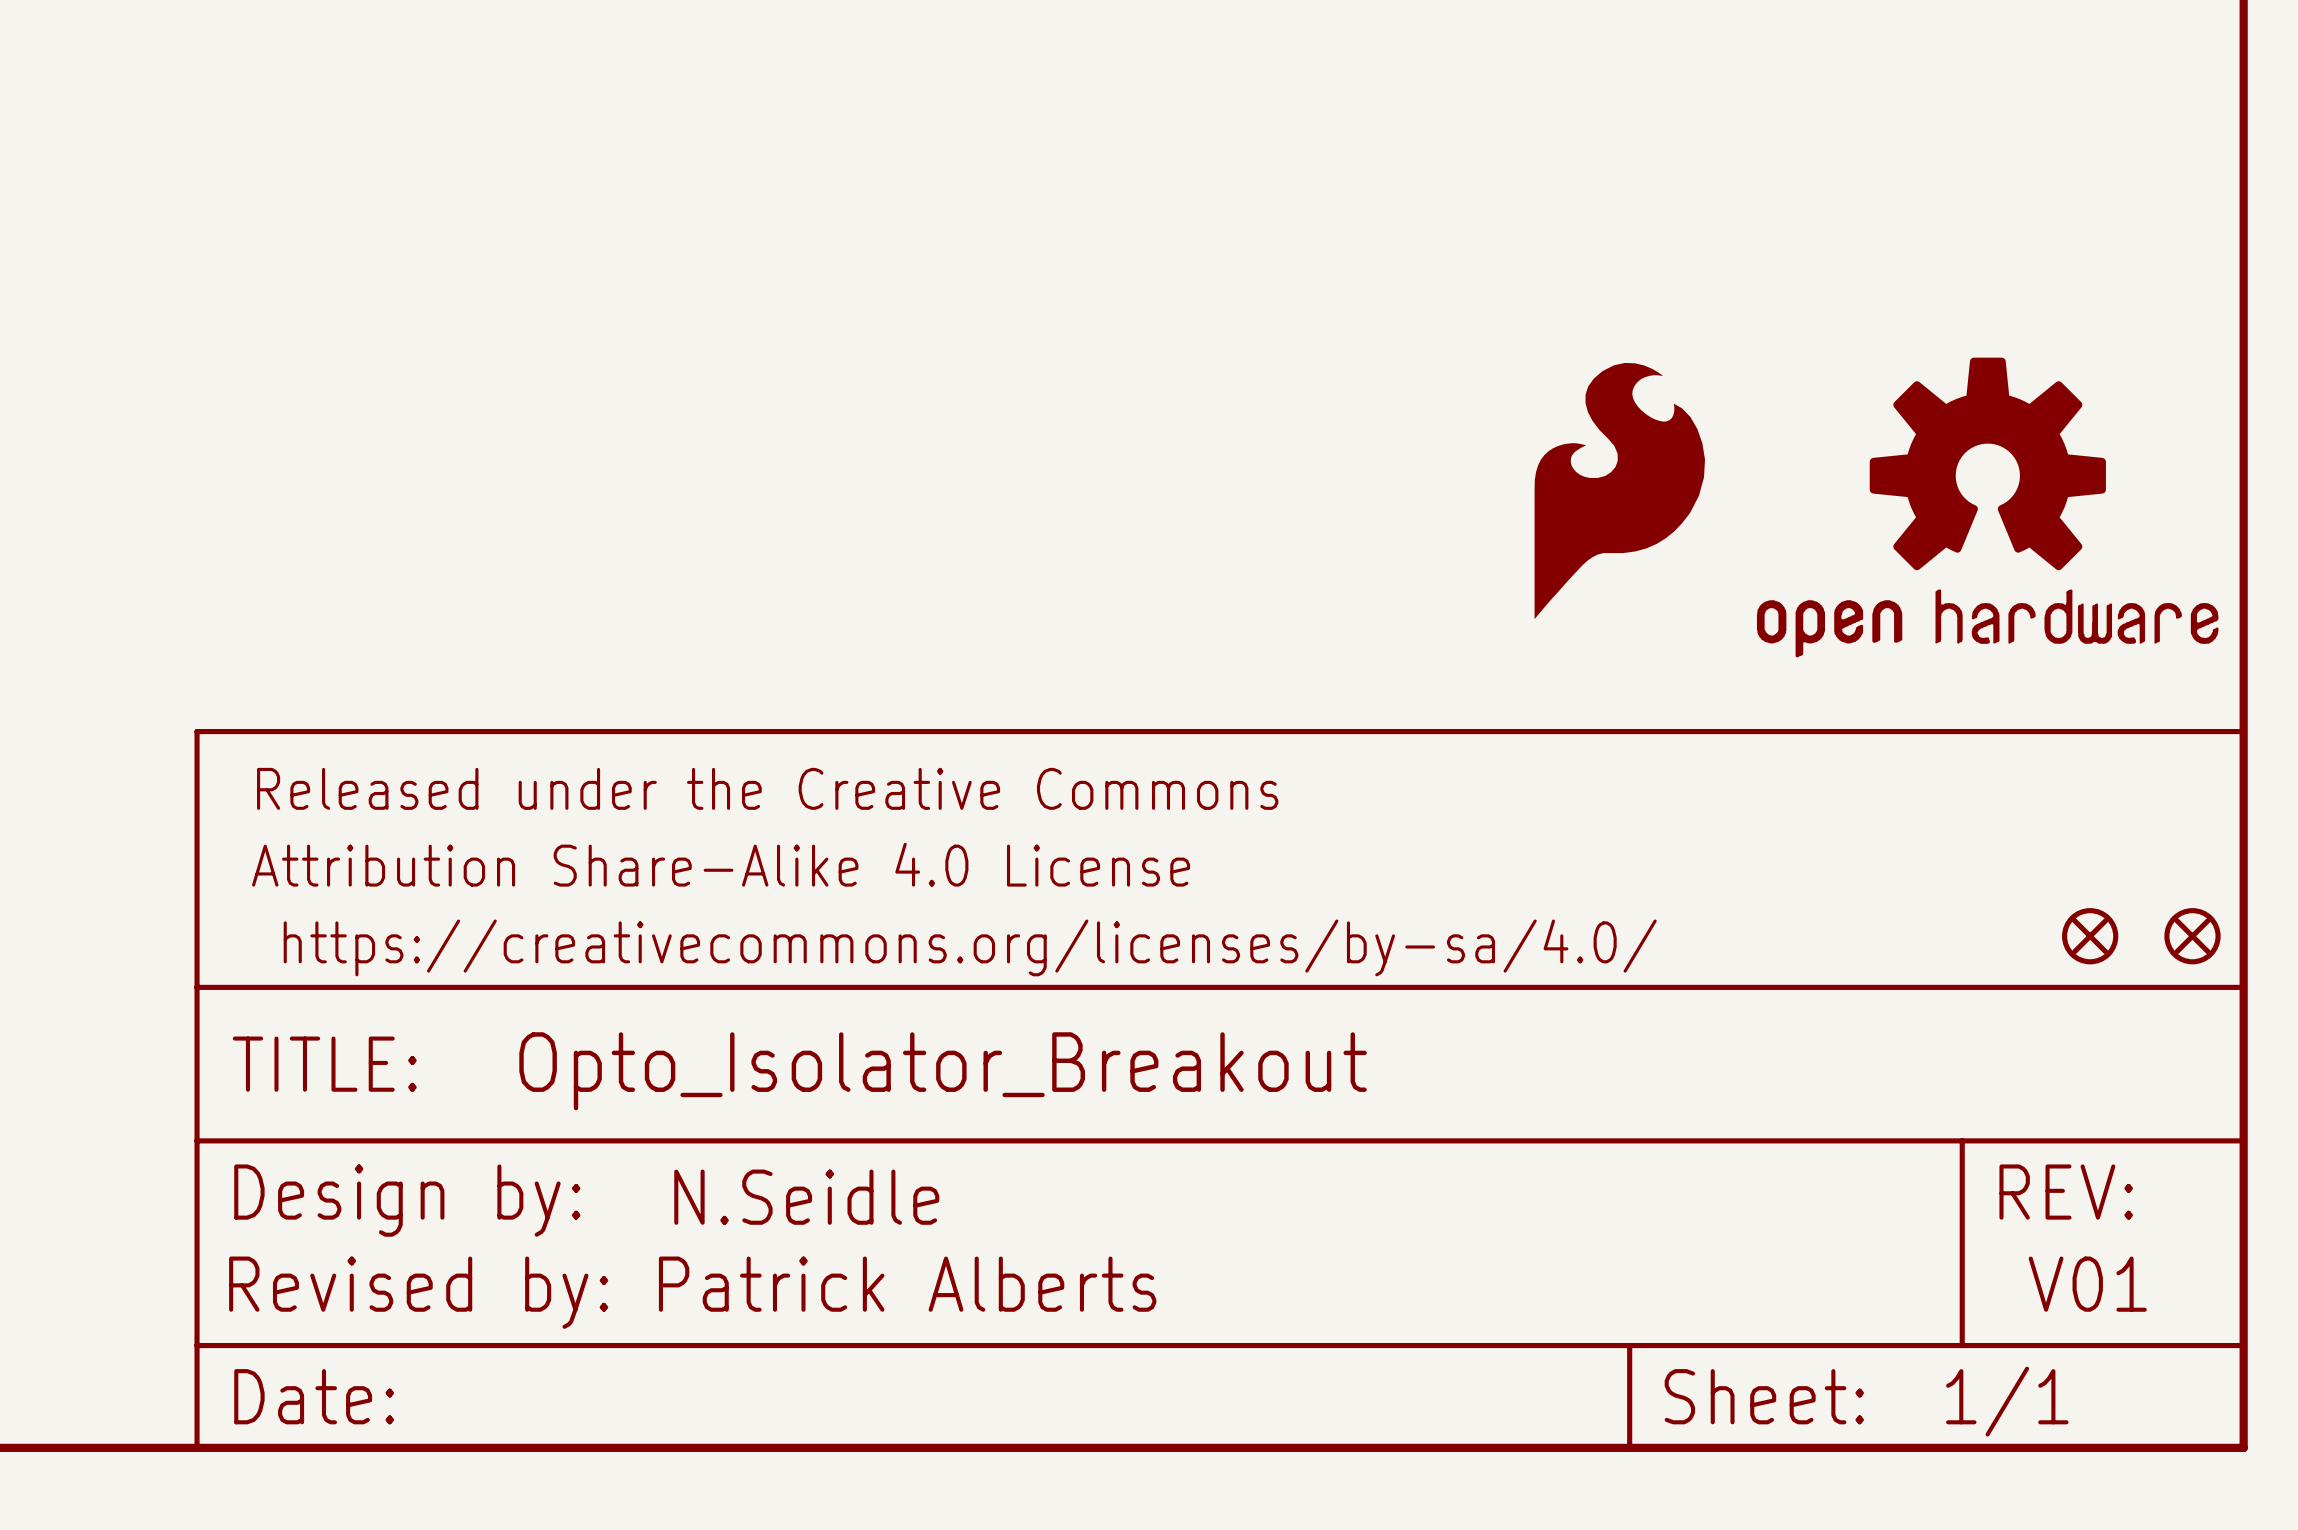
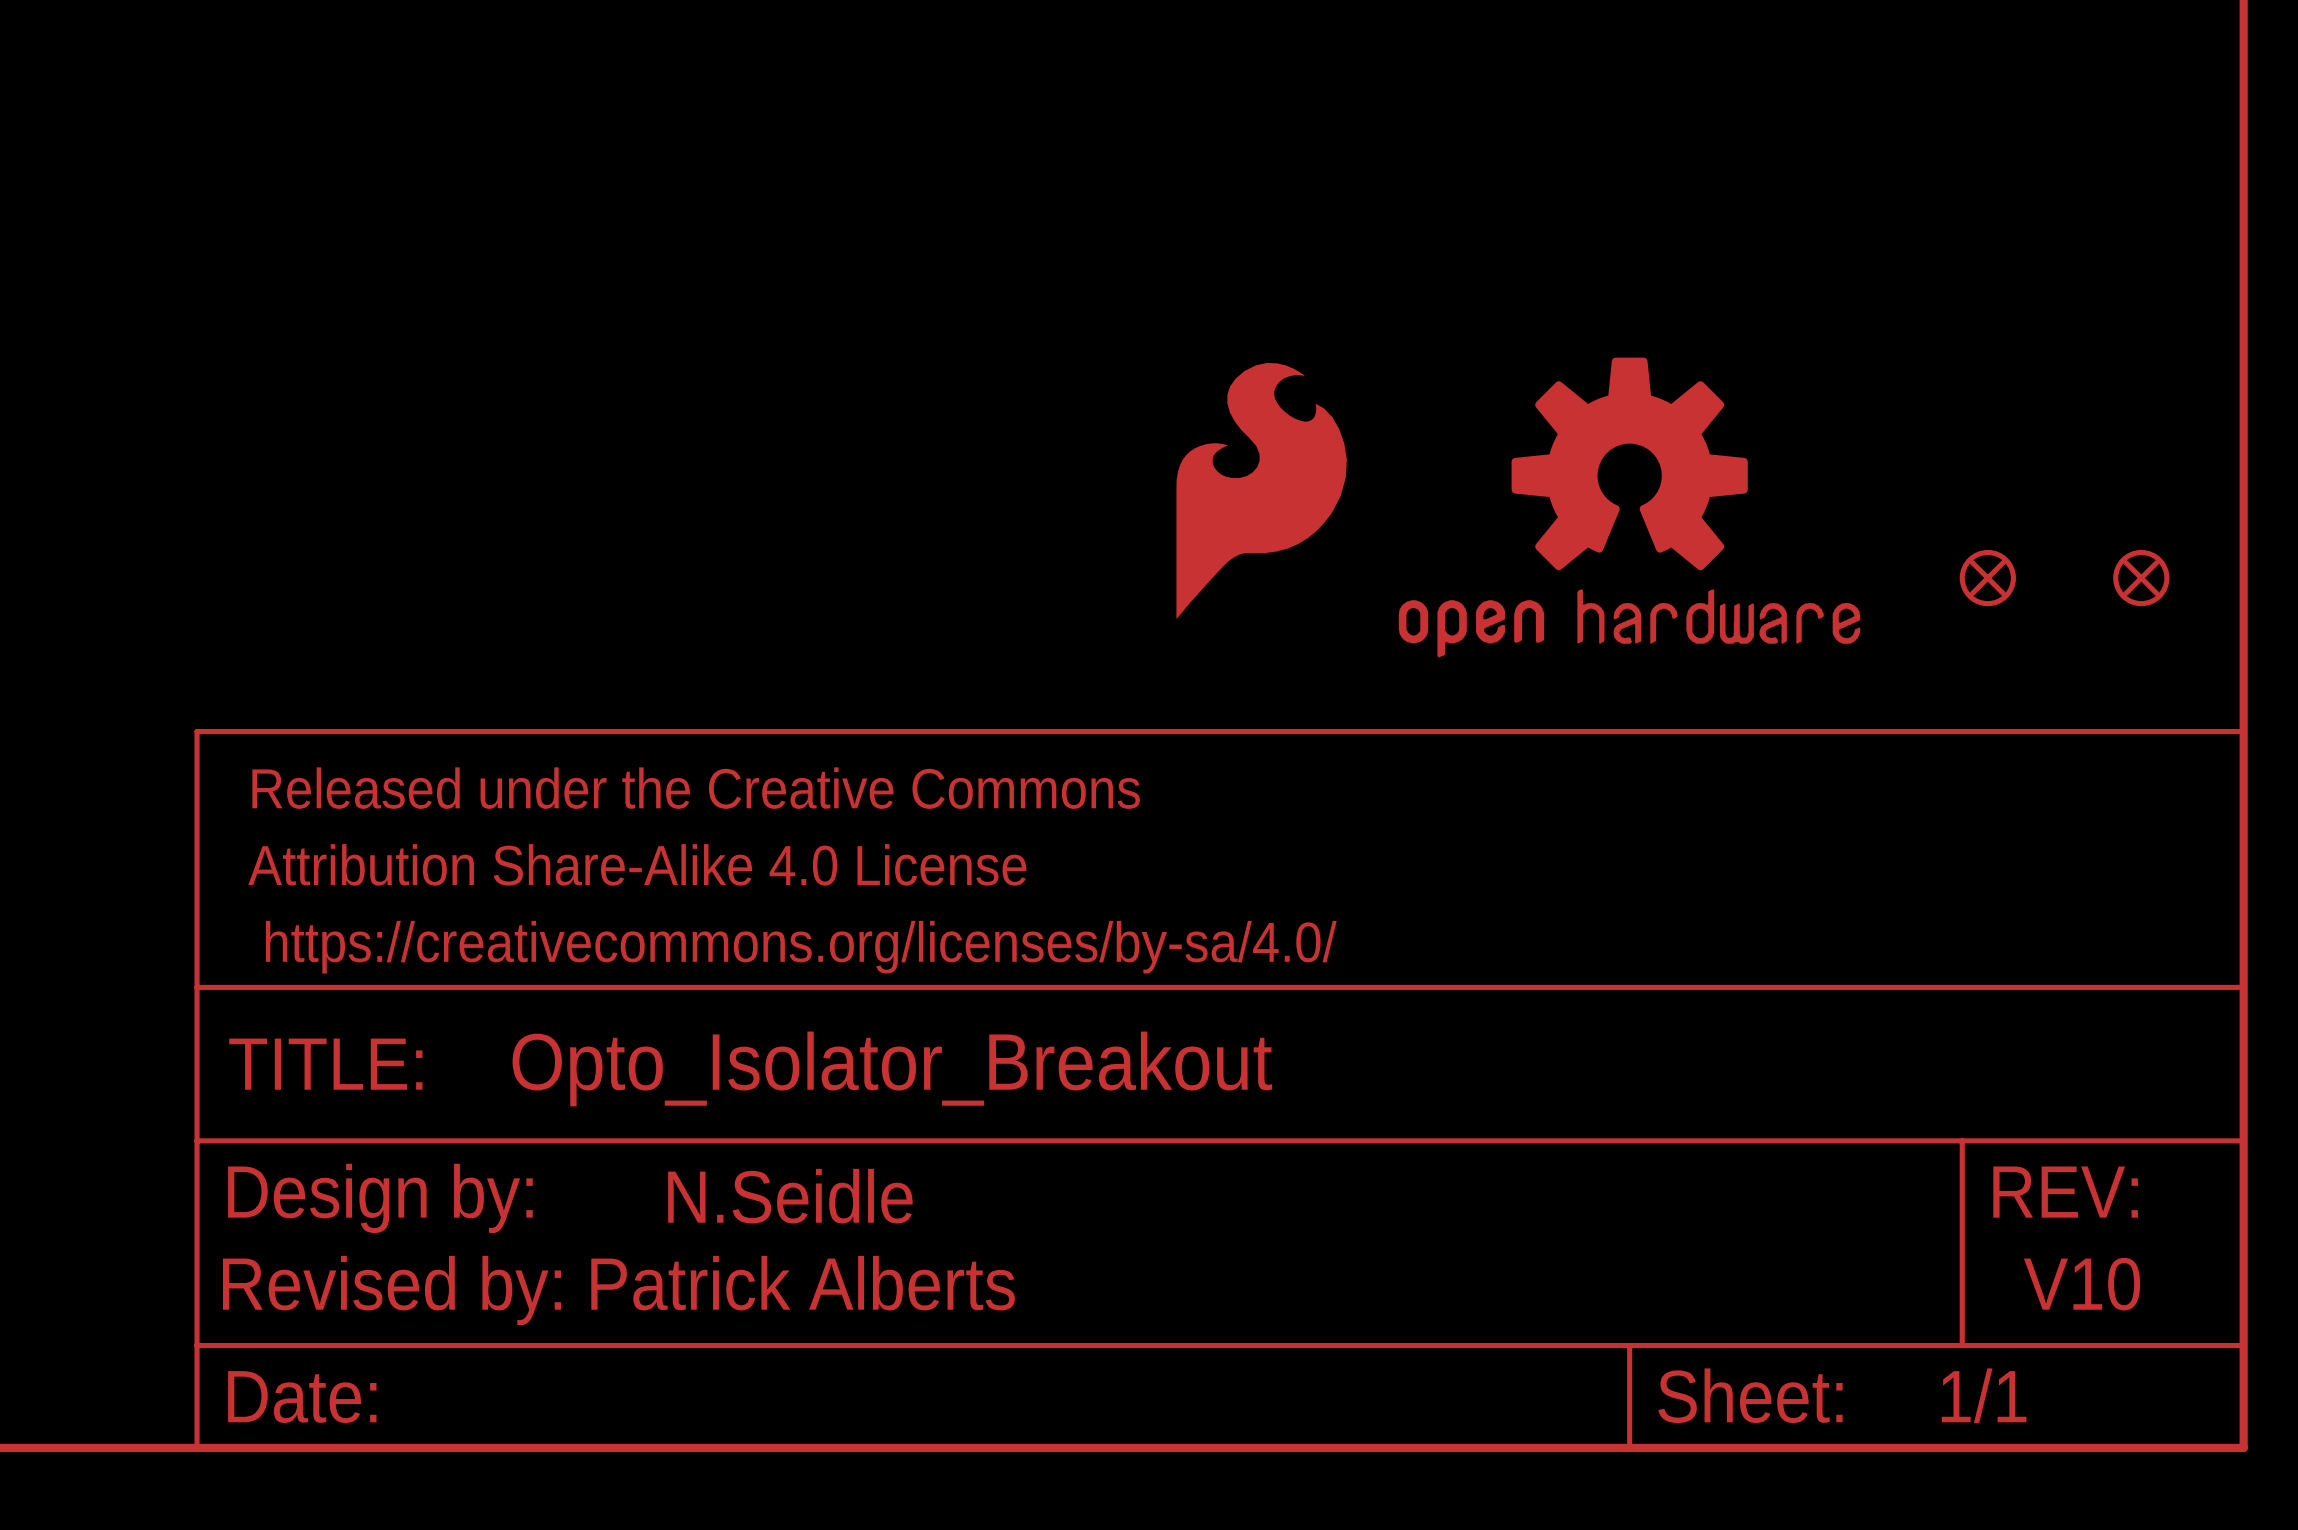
part symbol: [1534, 362, 1706, 619] -> [1398, 357, 1861, 658]
part: none -> (1261, 490)
part: (1987, 507) -> none
part: none -> (1987, 578)
part: none -> (2141, 578)
part: (2090, 936) -> none
part: (2192, 936) -> none
text: V01 (2087, 1284) -> V10 (2082, 1284)

